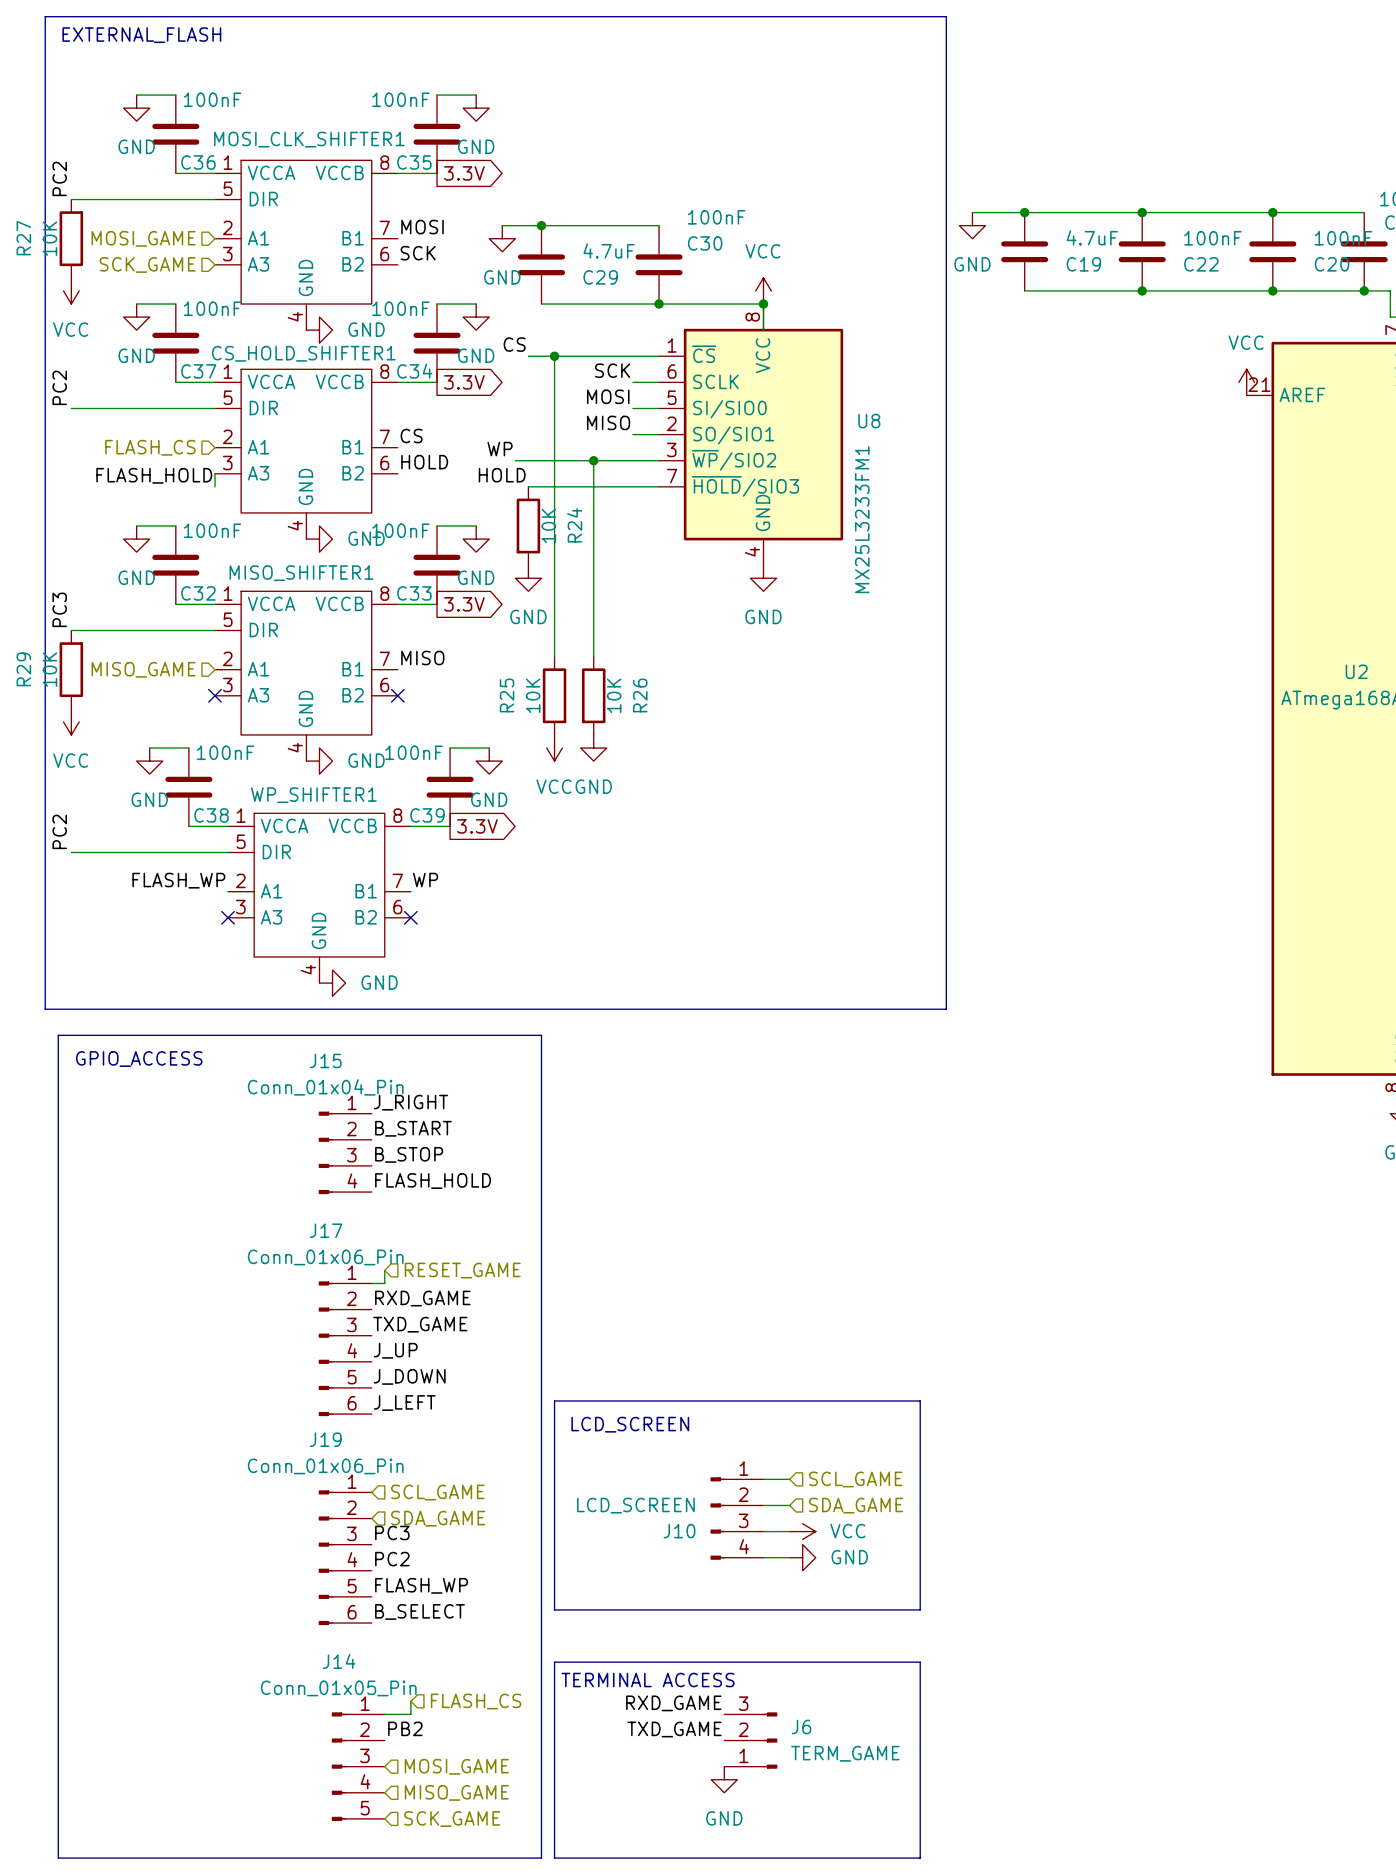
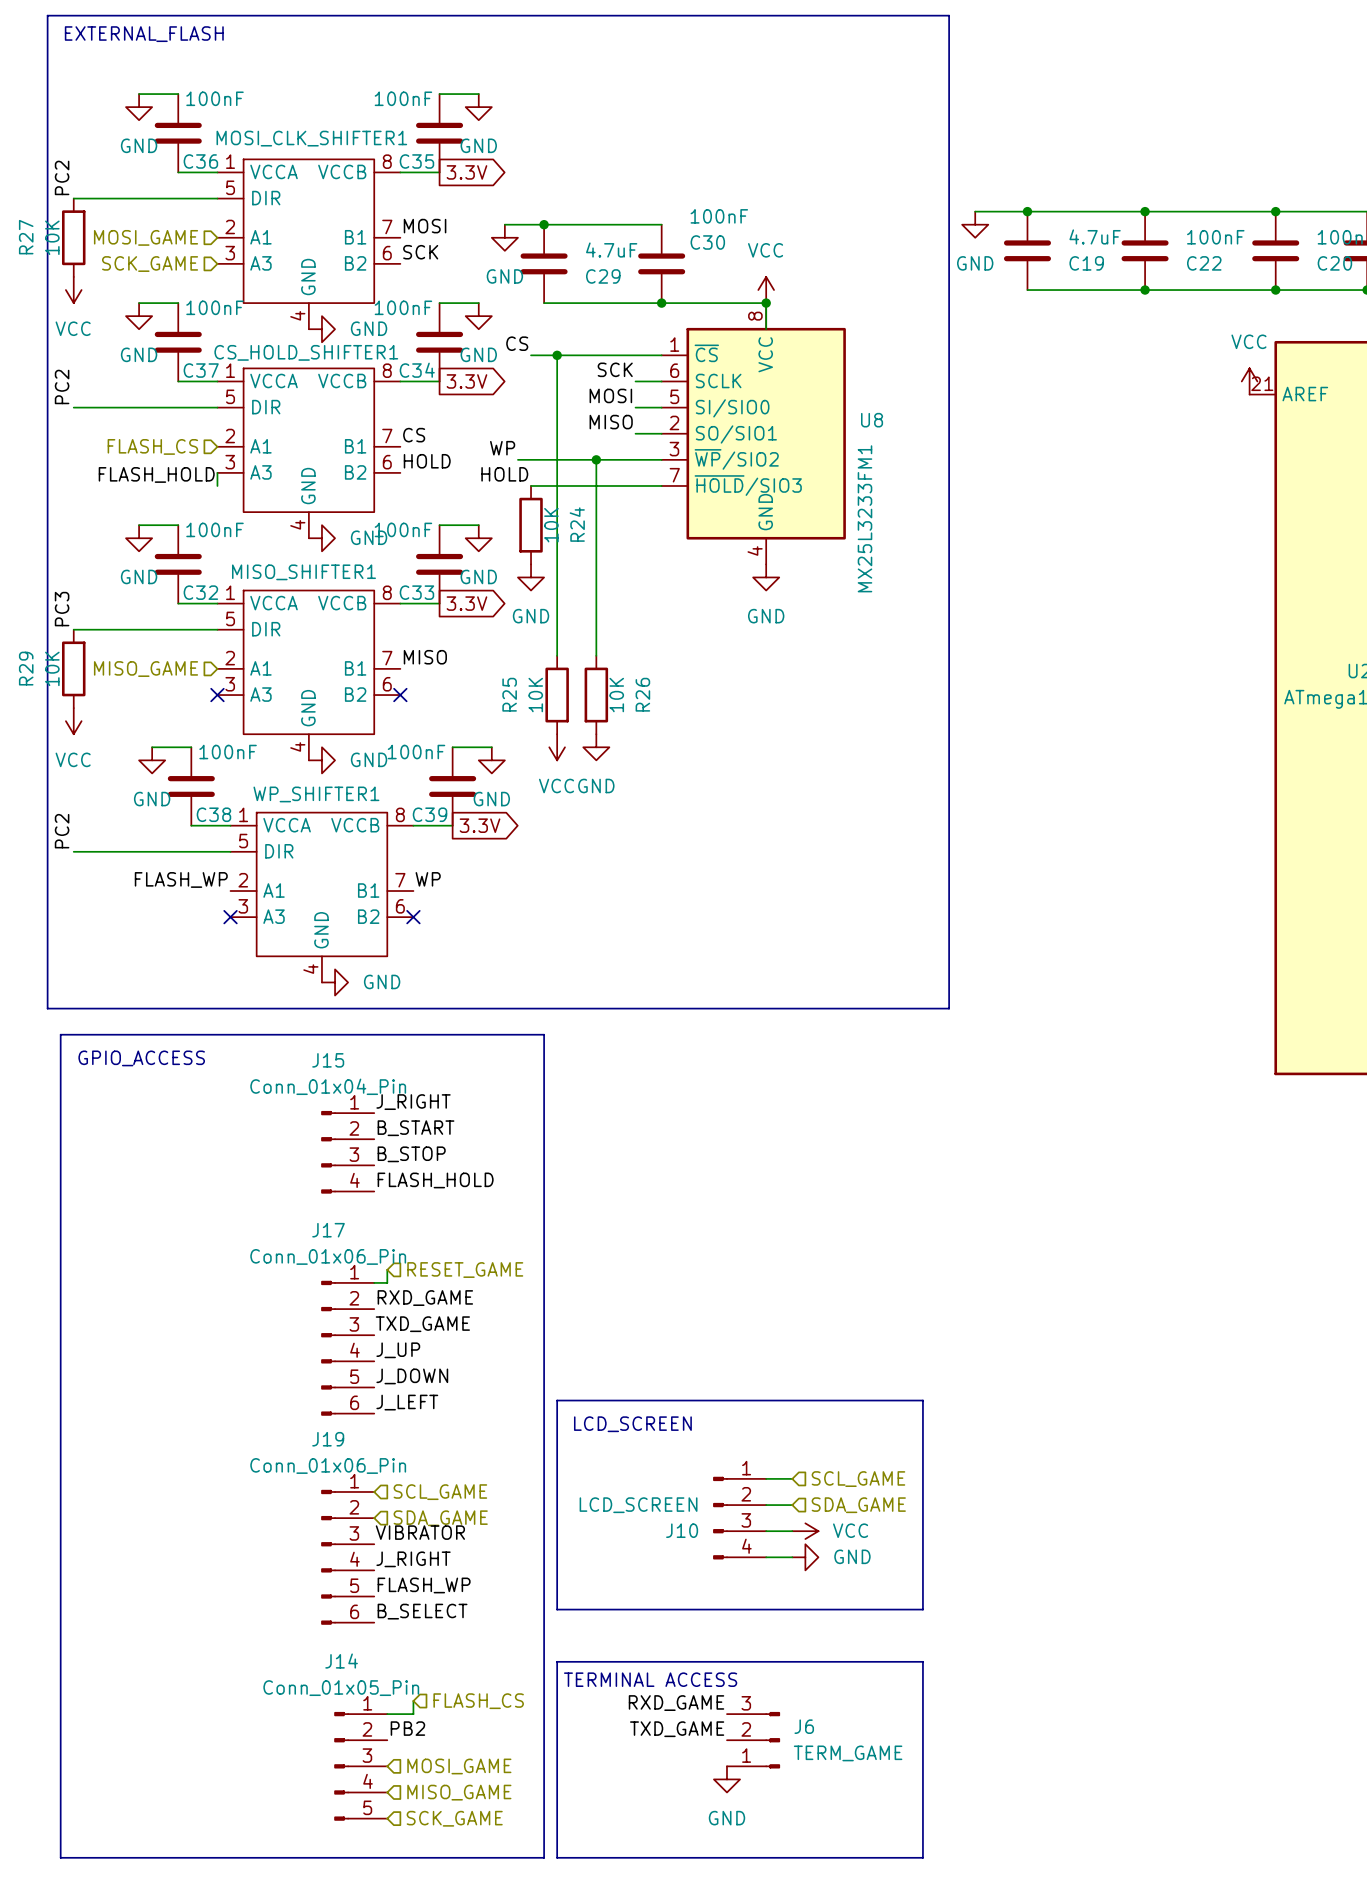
label: PC3 (392, 1532) -> VIBRATOR (420, 1532)
label: PC2 (392, 1559) -> J_RIGHT (413, 1559)

